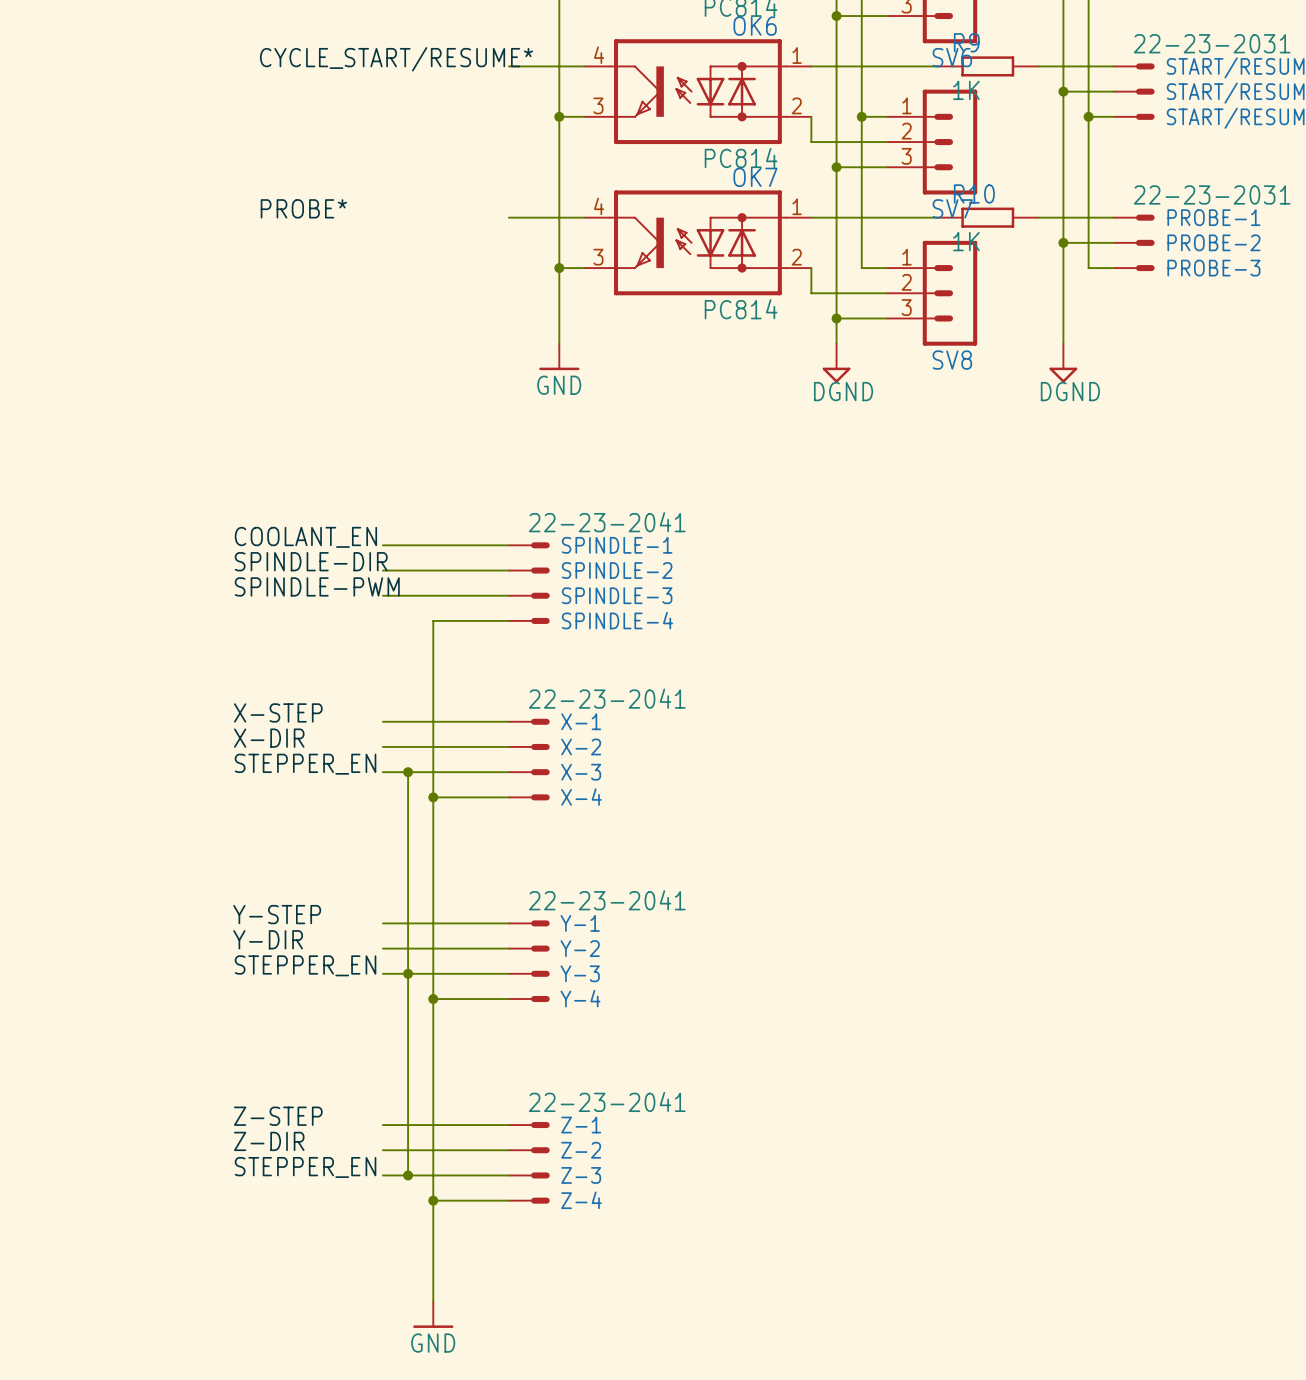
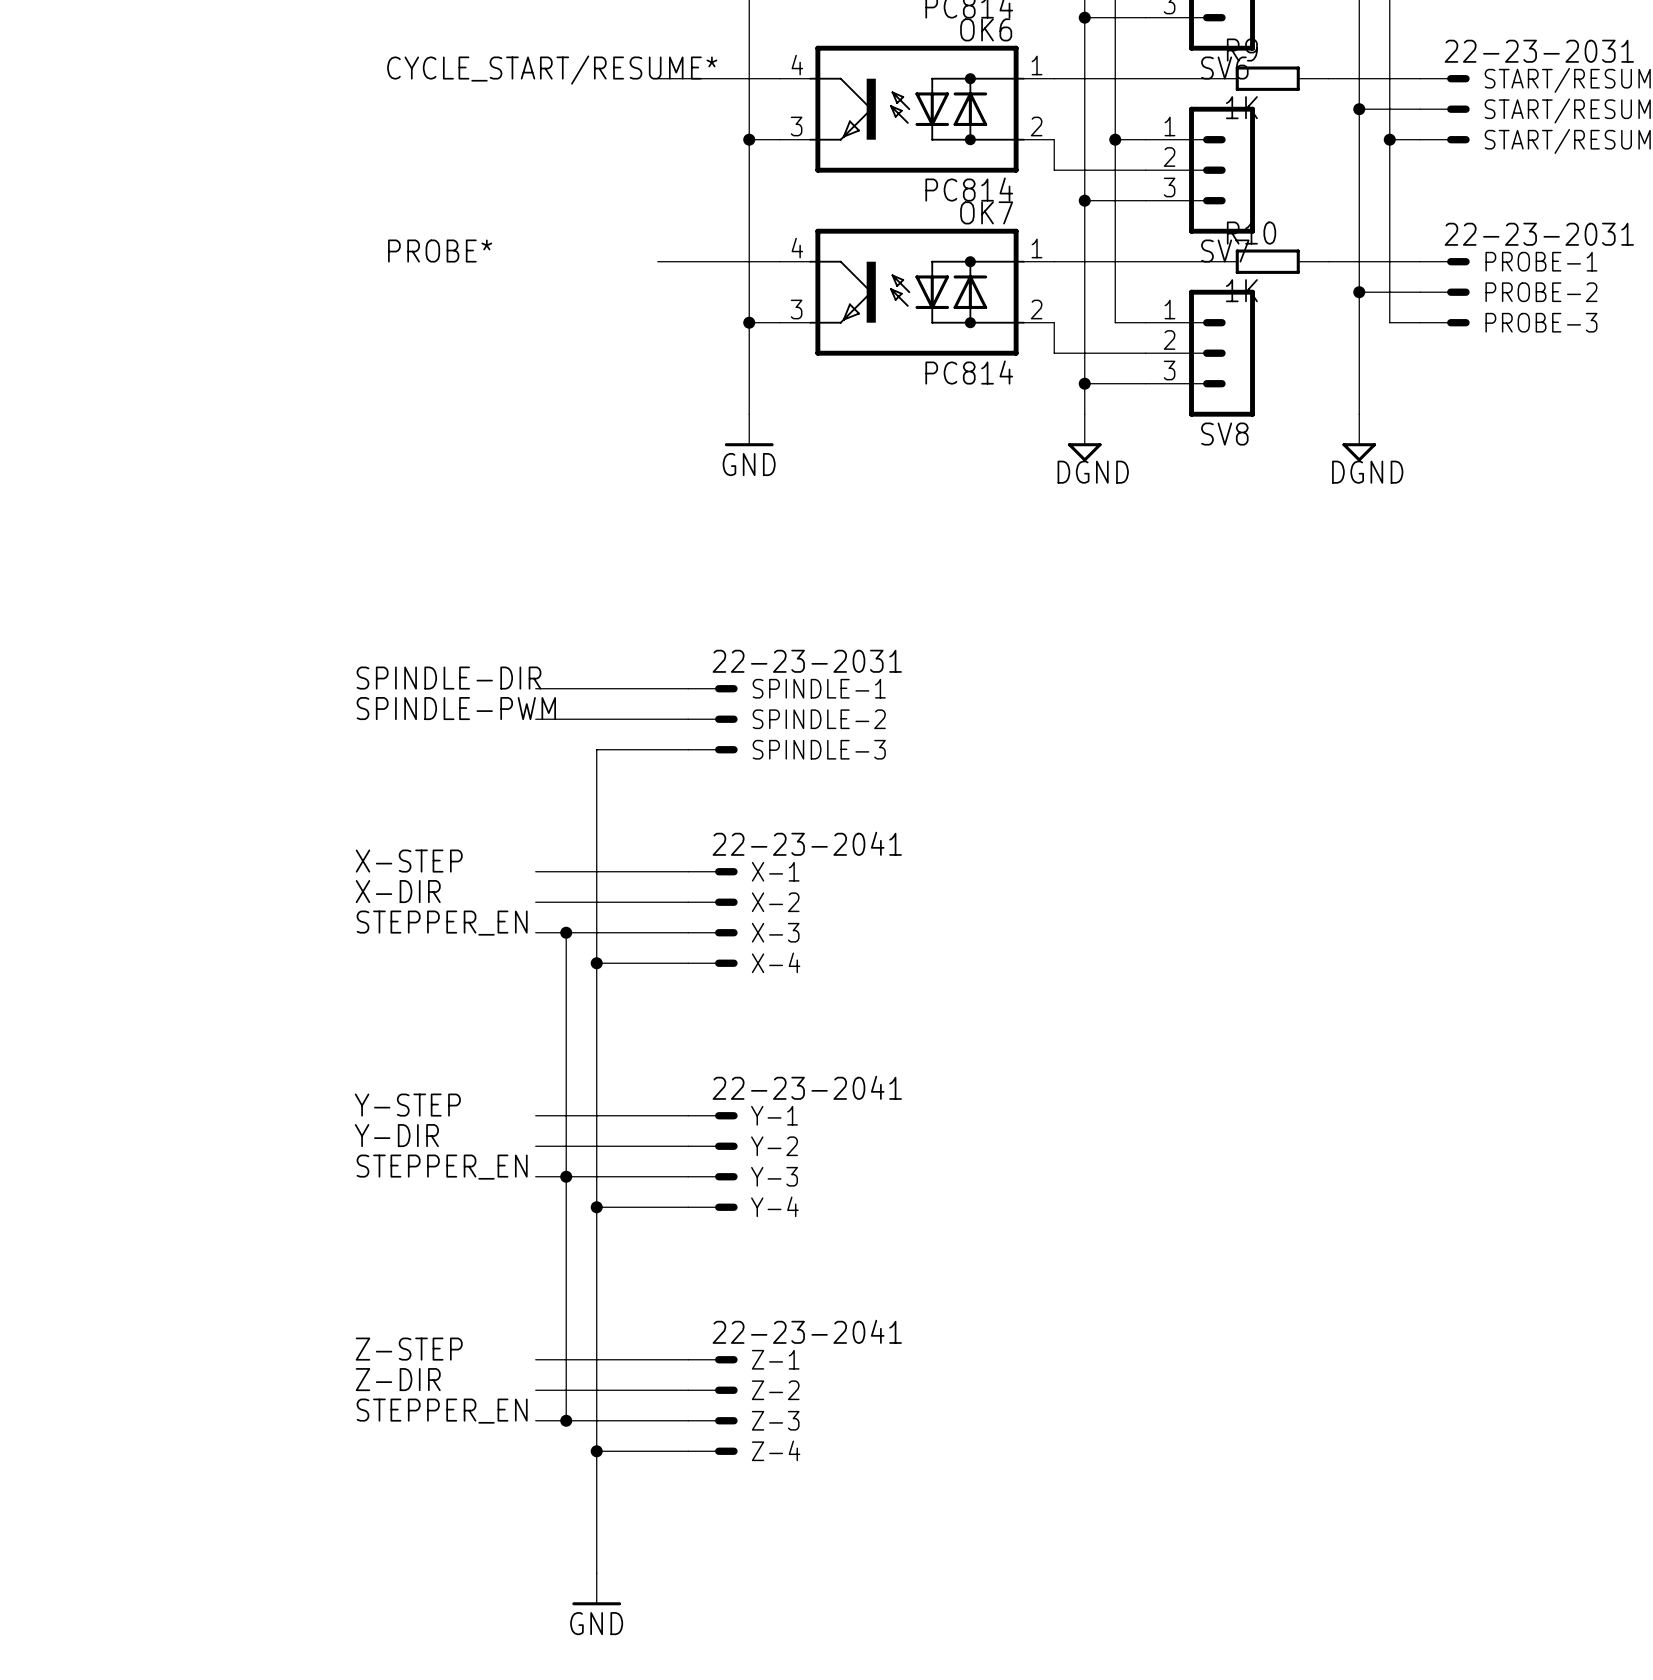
wire: none -> (657, 78) (688, 78)
wire: none -> (657, 261) (688, 261)
label: COOLANT_EN (305, 537) -> none
wire: (382, 545) (508, 545) -> none
SPINDLE-1: 22-23-2041 (529, 545) -> none
SPINDLE-2 value: none -> 22-23-2031 (807, 661)
SPINDLE-2 name: SPINDLE-2 (617, 570) -> SPINDLE-1 (819, 688)
SPINDLE-3 name: SPINDLE-3 (617, 595) -> SPINDLE-2 (819, 719)
SPINDLE-4 name: SPINDLE-4 (617, 620) -> SPINDLE-3 (819, 749)

